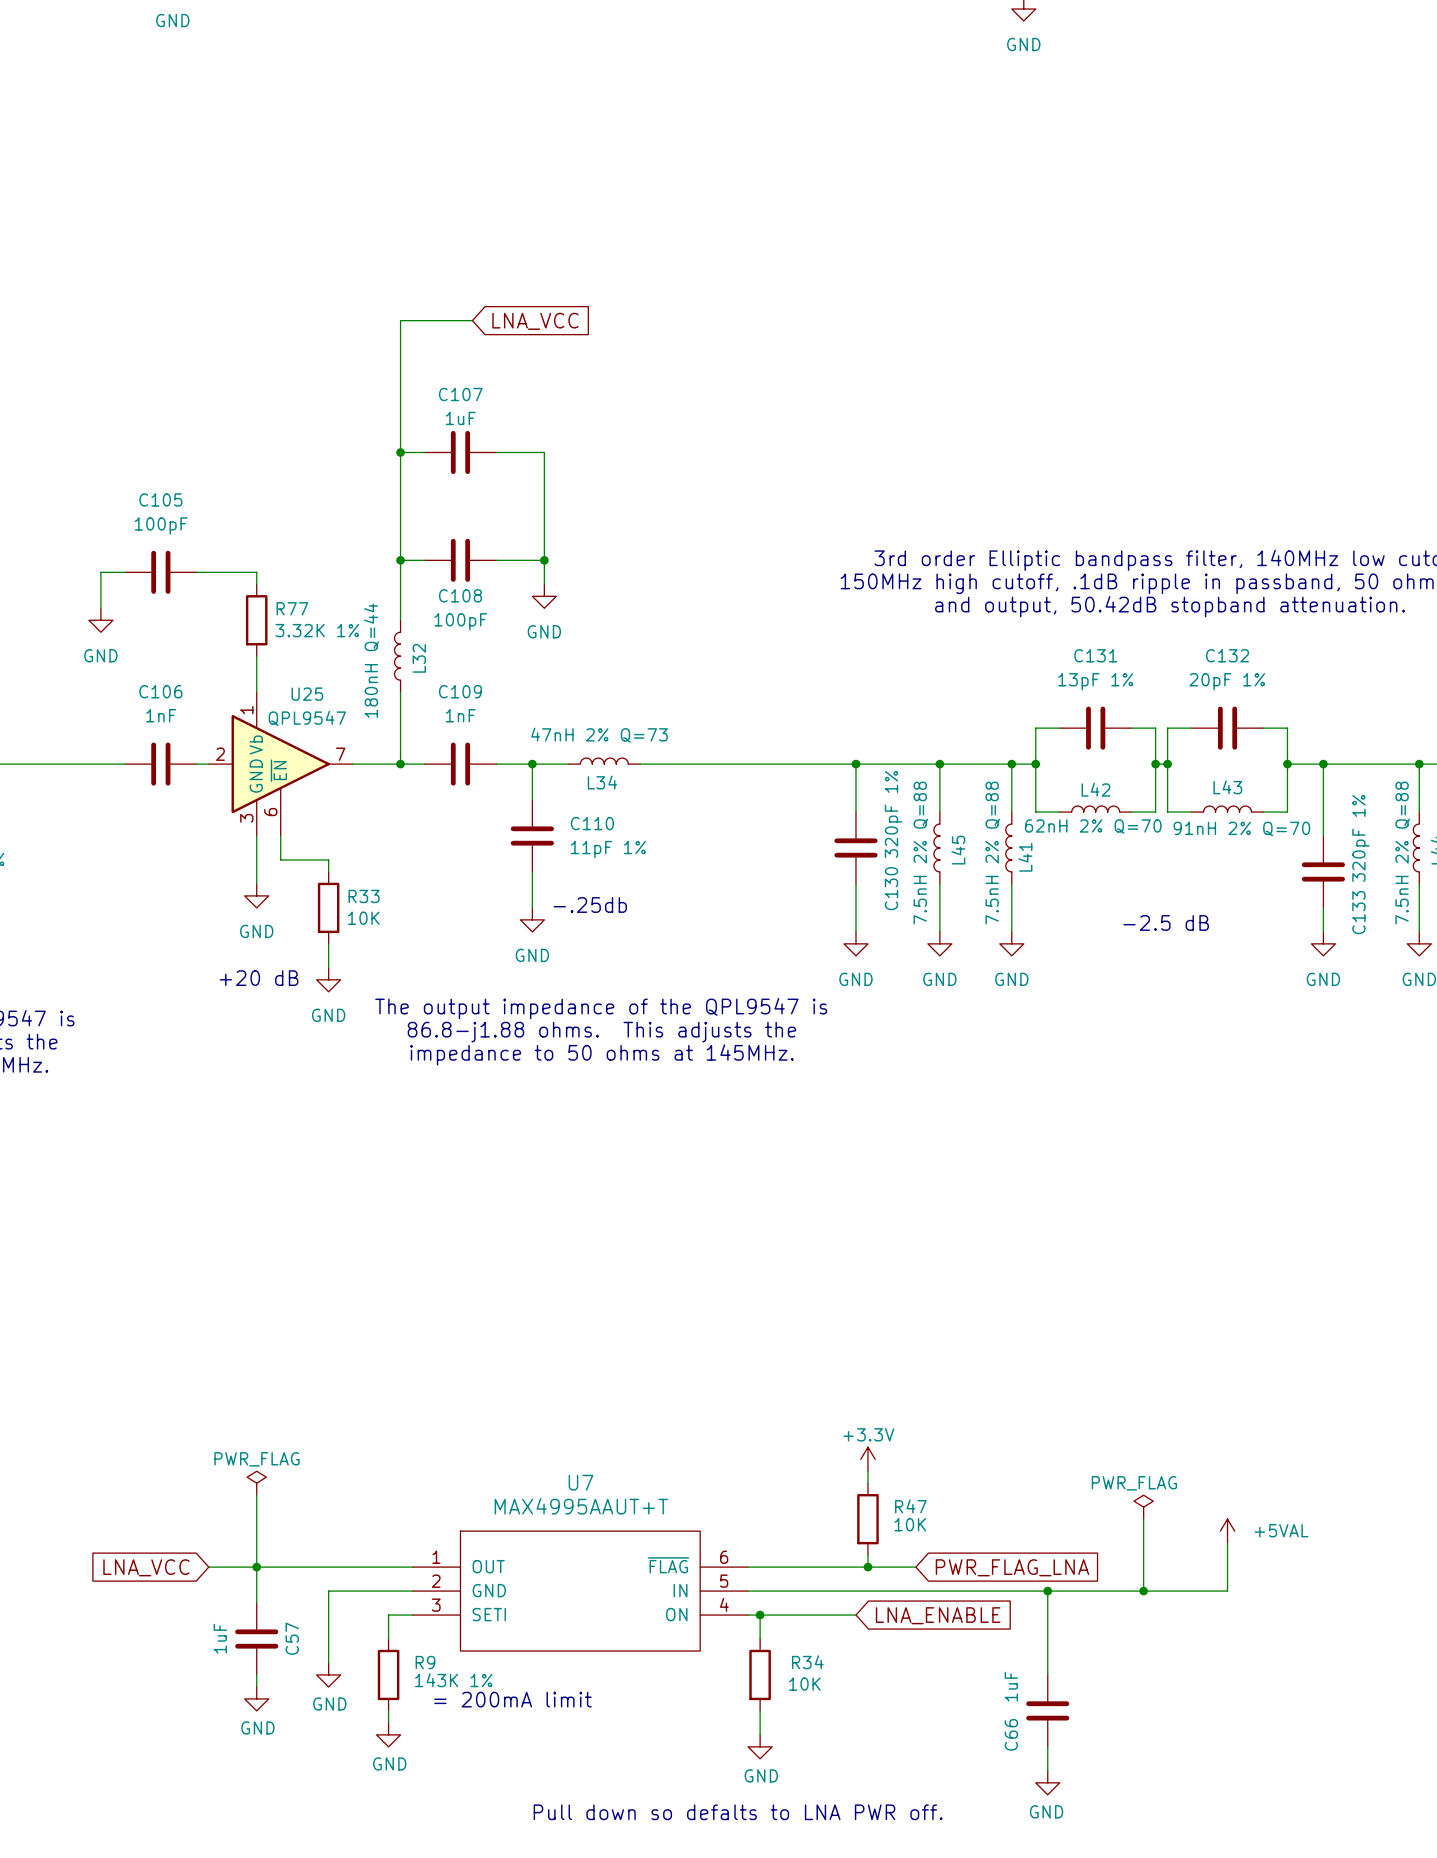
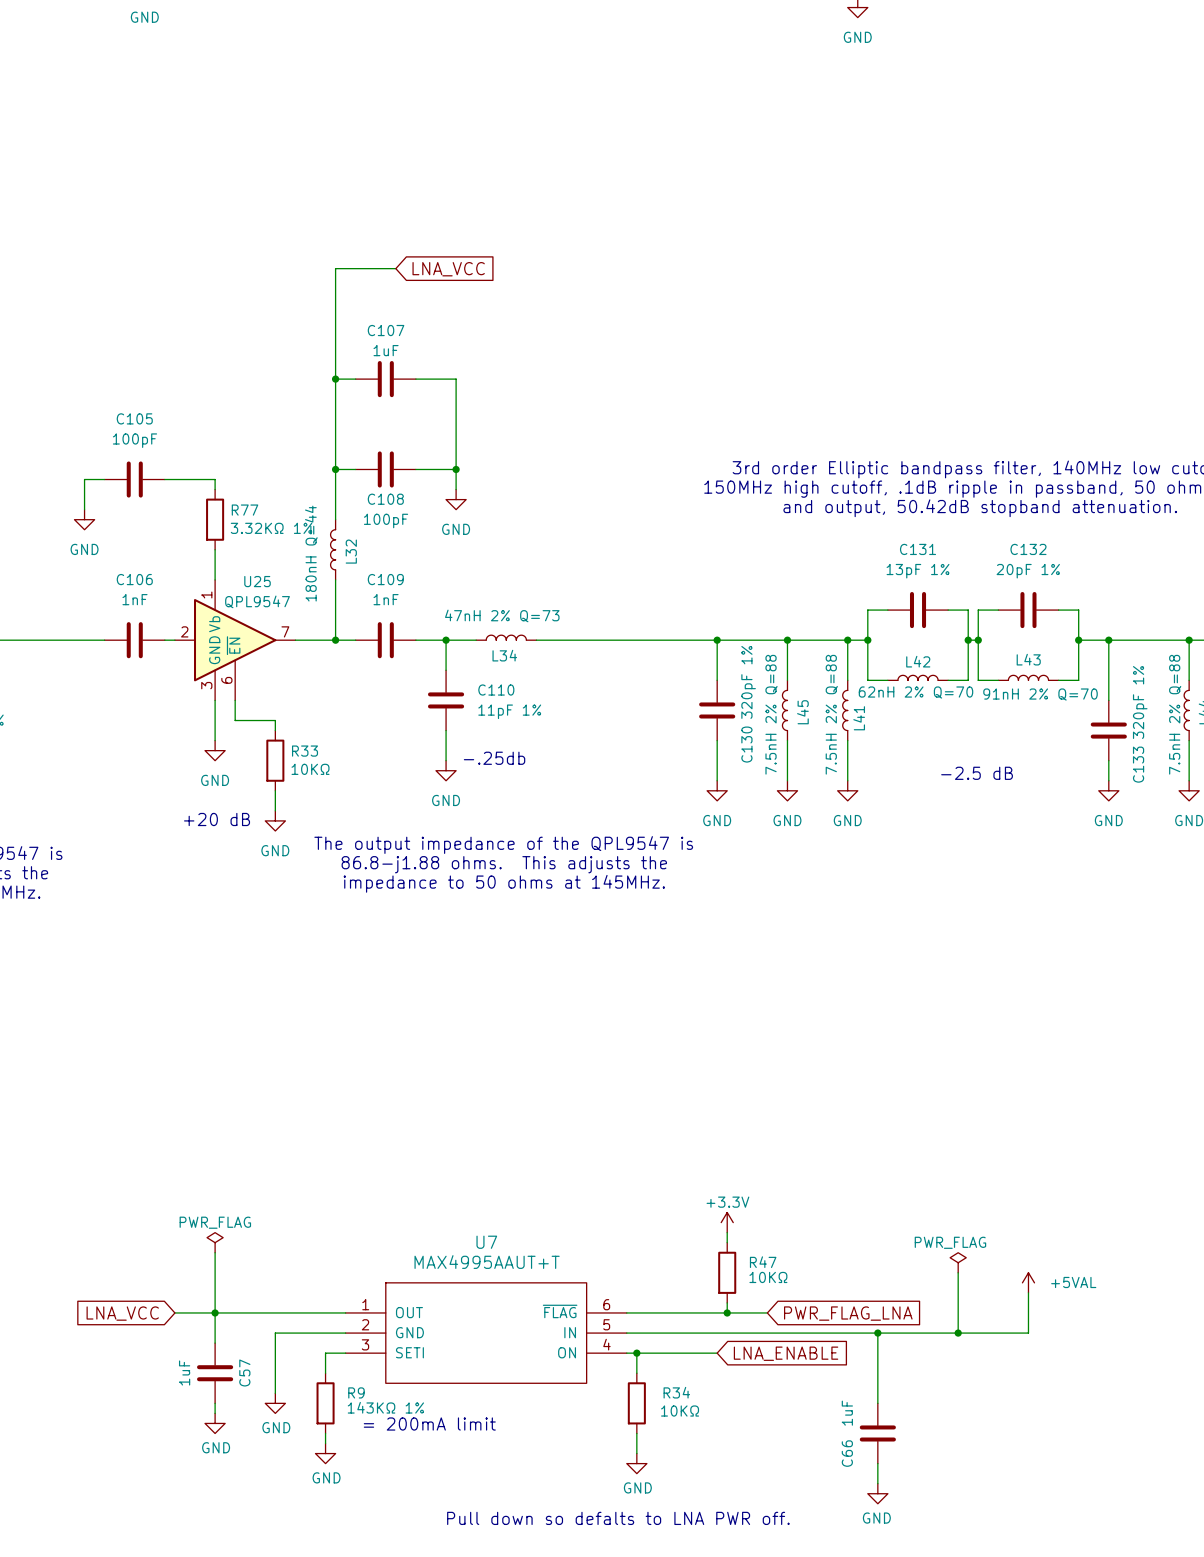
R77 value: 3.32K 1% (317, 630) -> 3.32KΩ 1% (271, 528)
R33 value: 10K (363, 918) -> 10KΩ (310, 769)
R47 value: 10K (910, 1524) -> 10KΩ (768, 1277)
R9 value: 143K 1% (453, 1680) -> 143KΩ 1% (385, 1407)
R34 value: 10K (804, 1684) -> 10KΩ (680, 1411)

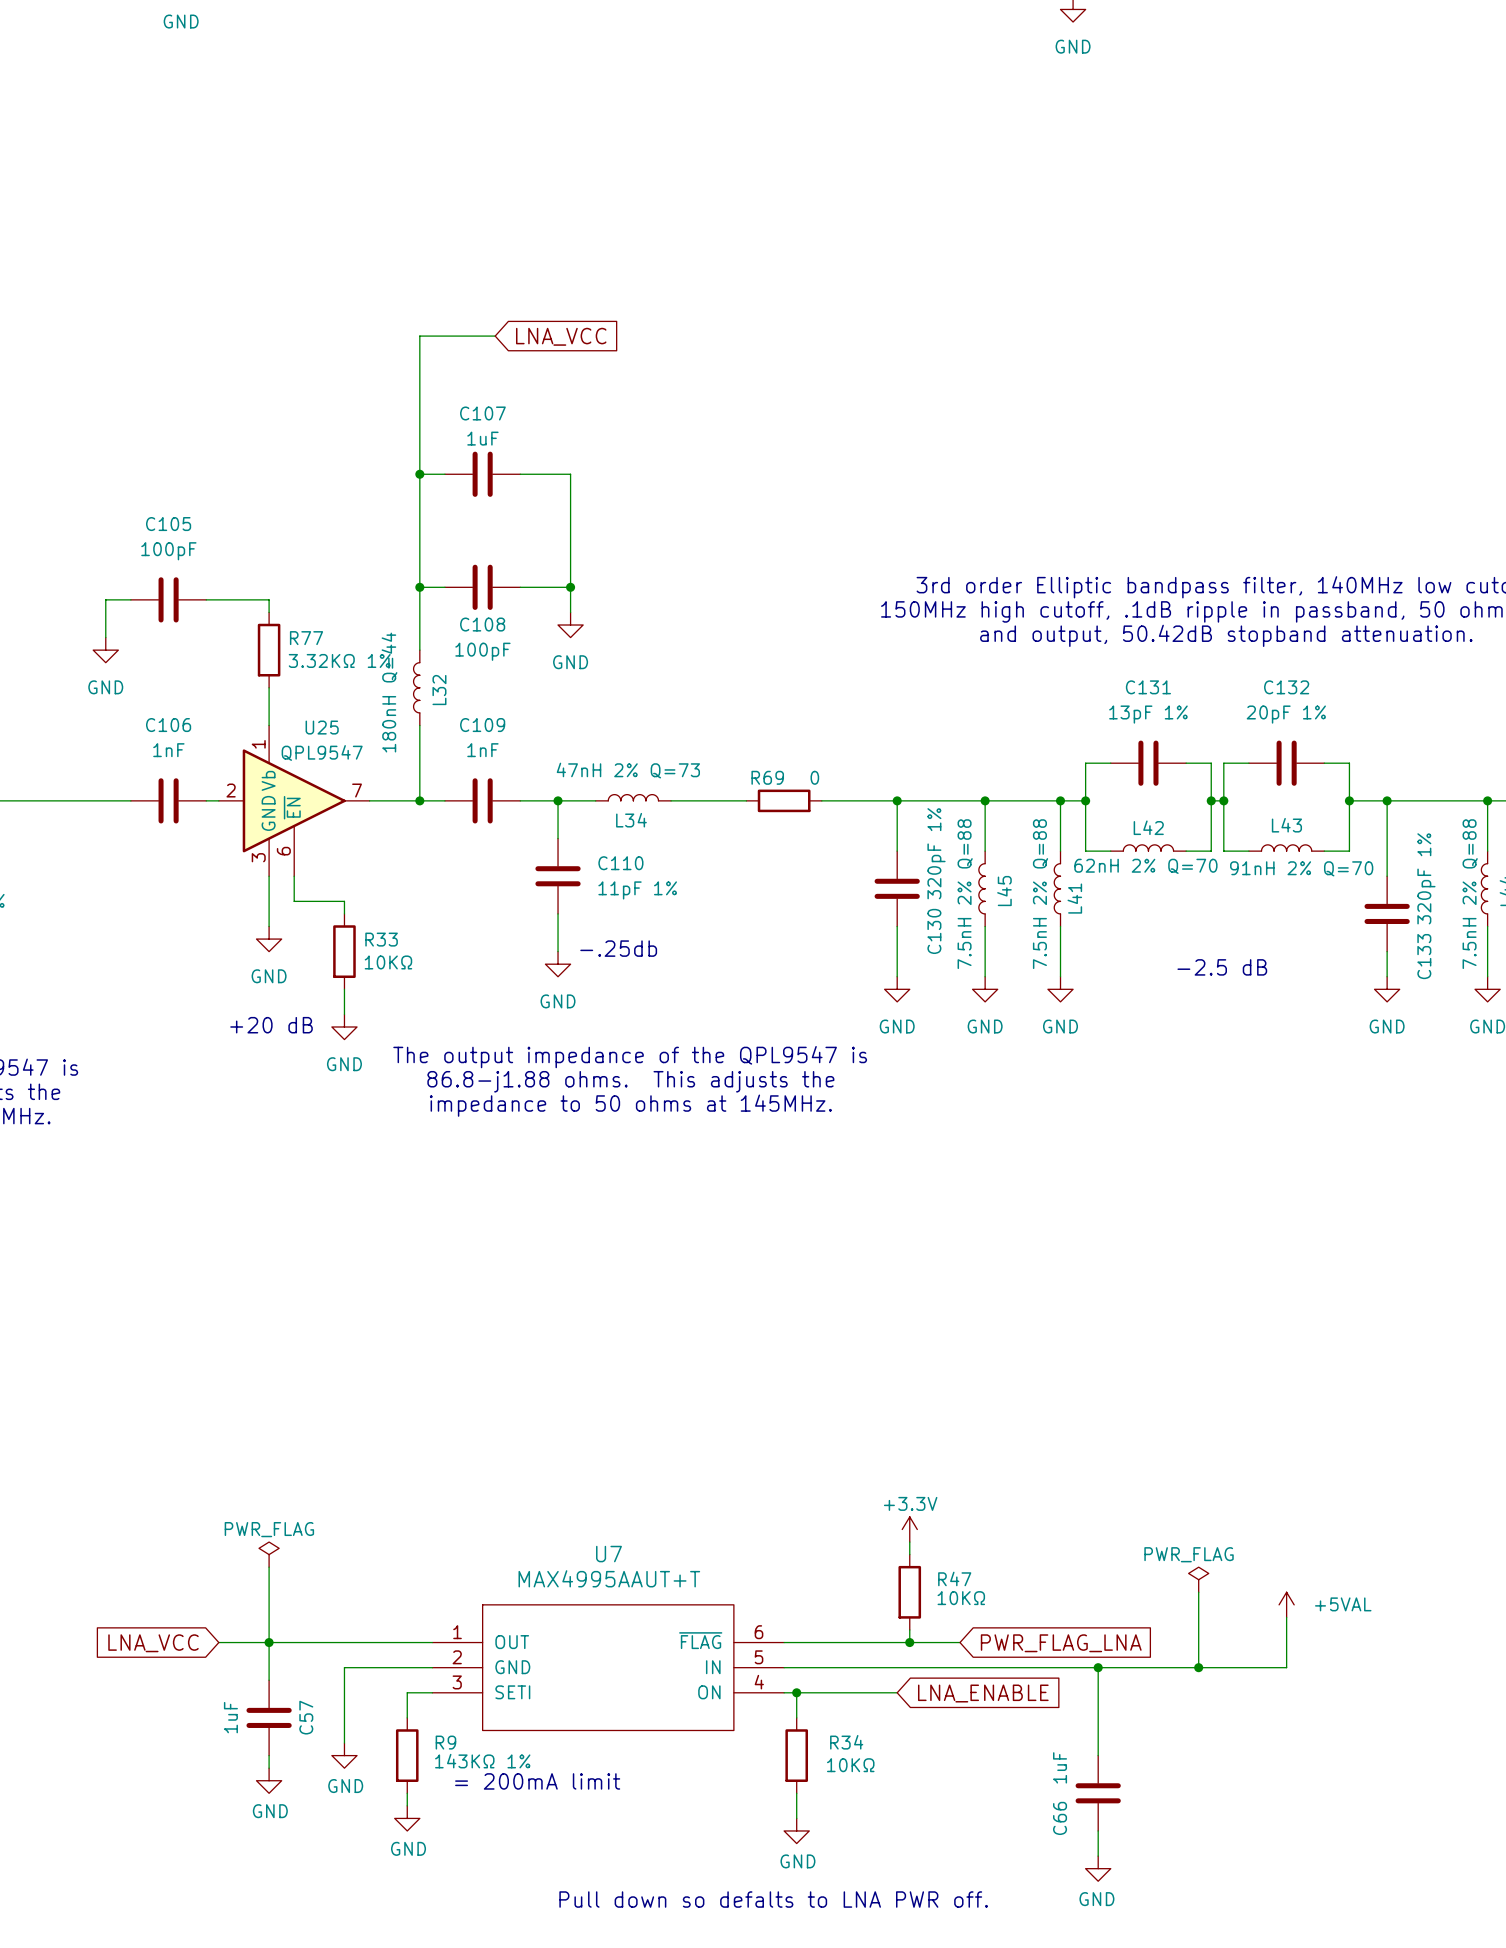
wire: (596, 640) (656, 640) -> none
R69: none -> 0 (784, 800)

